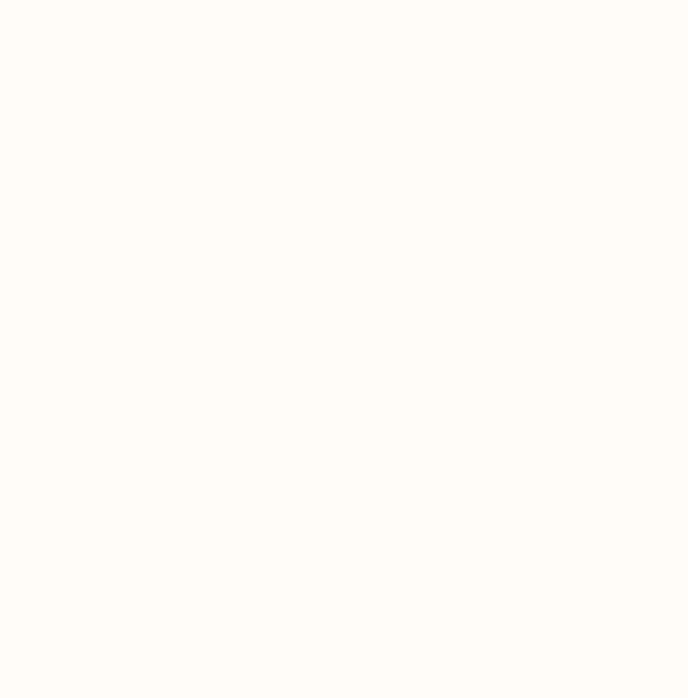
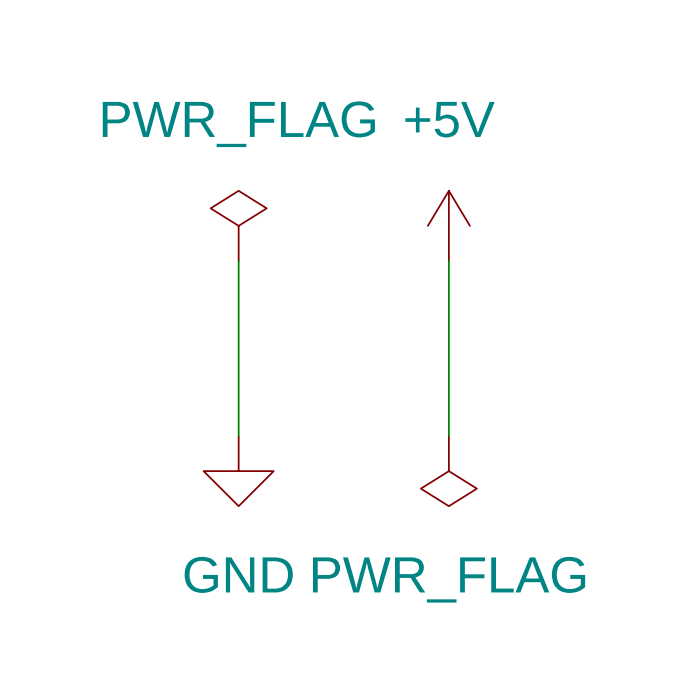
power symbol: none -> PWR_FLAG (238, 225)
power symbol: none -> +5V (448, 225)
wire: none -> (238, 260) (238, 436)
wire: none -> (448, 260) (448, 436)
power symbol: none -> GND (238, 471)
power symbol: none -> PWR_FLAG (448, 471)

